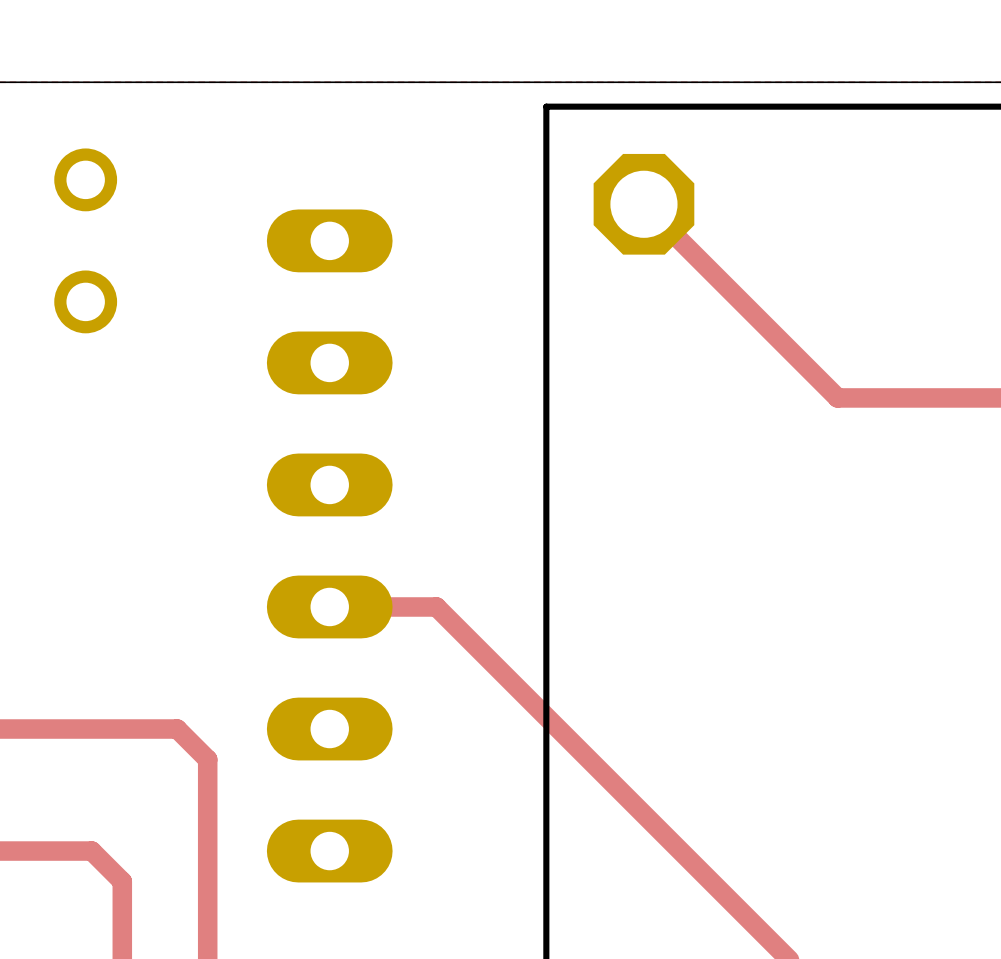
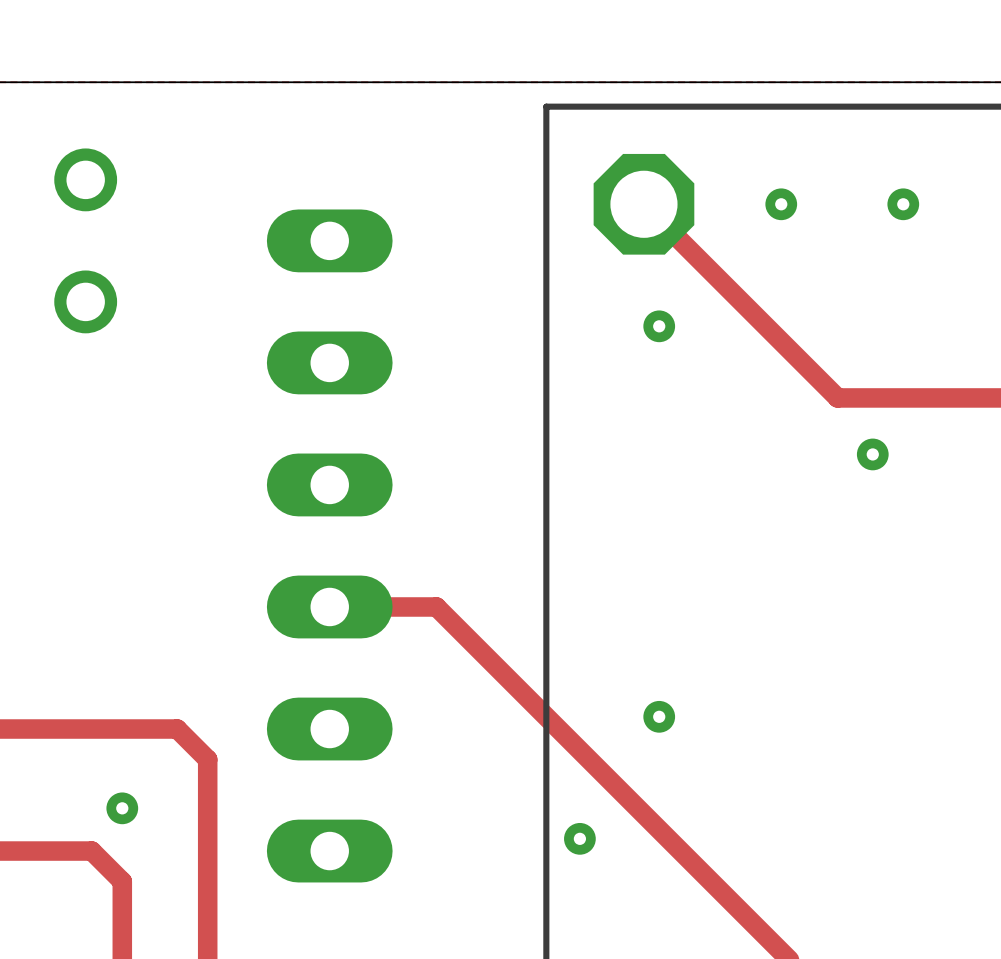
via: none -> (781, 204)
via: none -> (903, 204)
via: none -> (659, 326)
via: none -> (872, 454)
via: none -> (659, 716)
via: none -> (122, 808)
via: none -> (579, 838)

